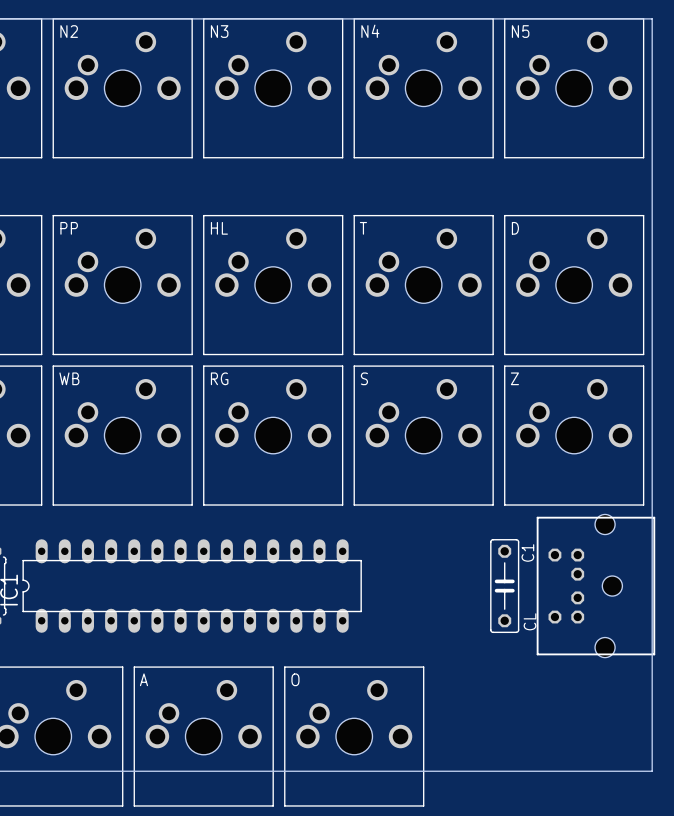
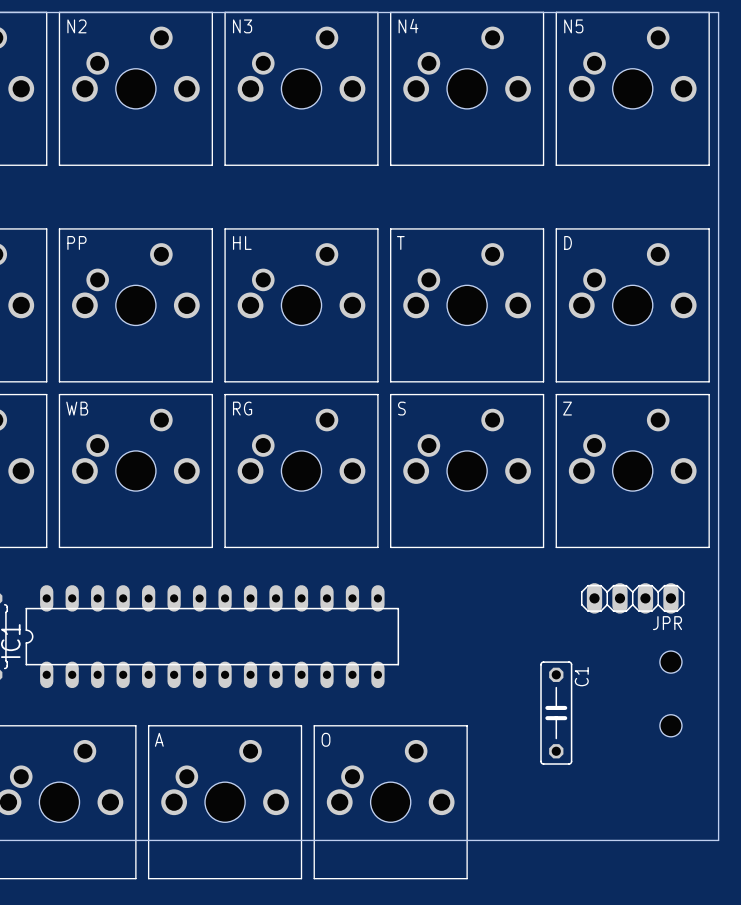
JPR: none -> (632, 598)
C1 position: (504, 586) -> (556, 713)
CL: (595, 586) -> none
hole: none -> (670, 662)
hole: none -> (670, 725)

